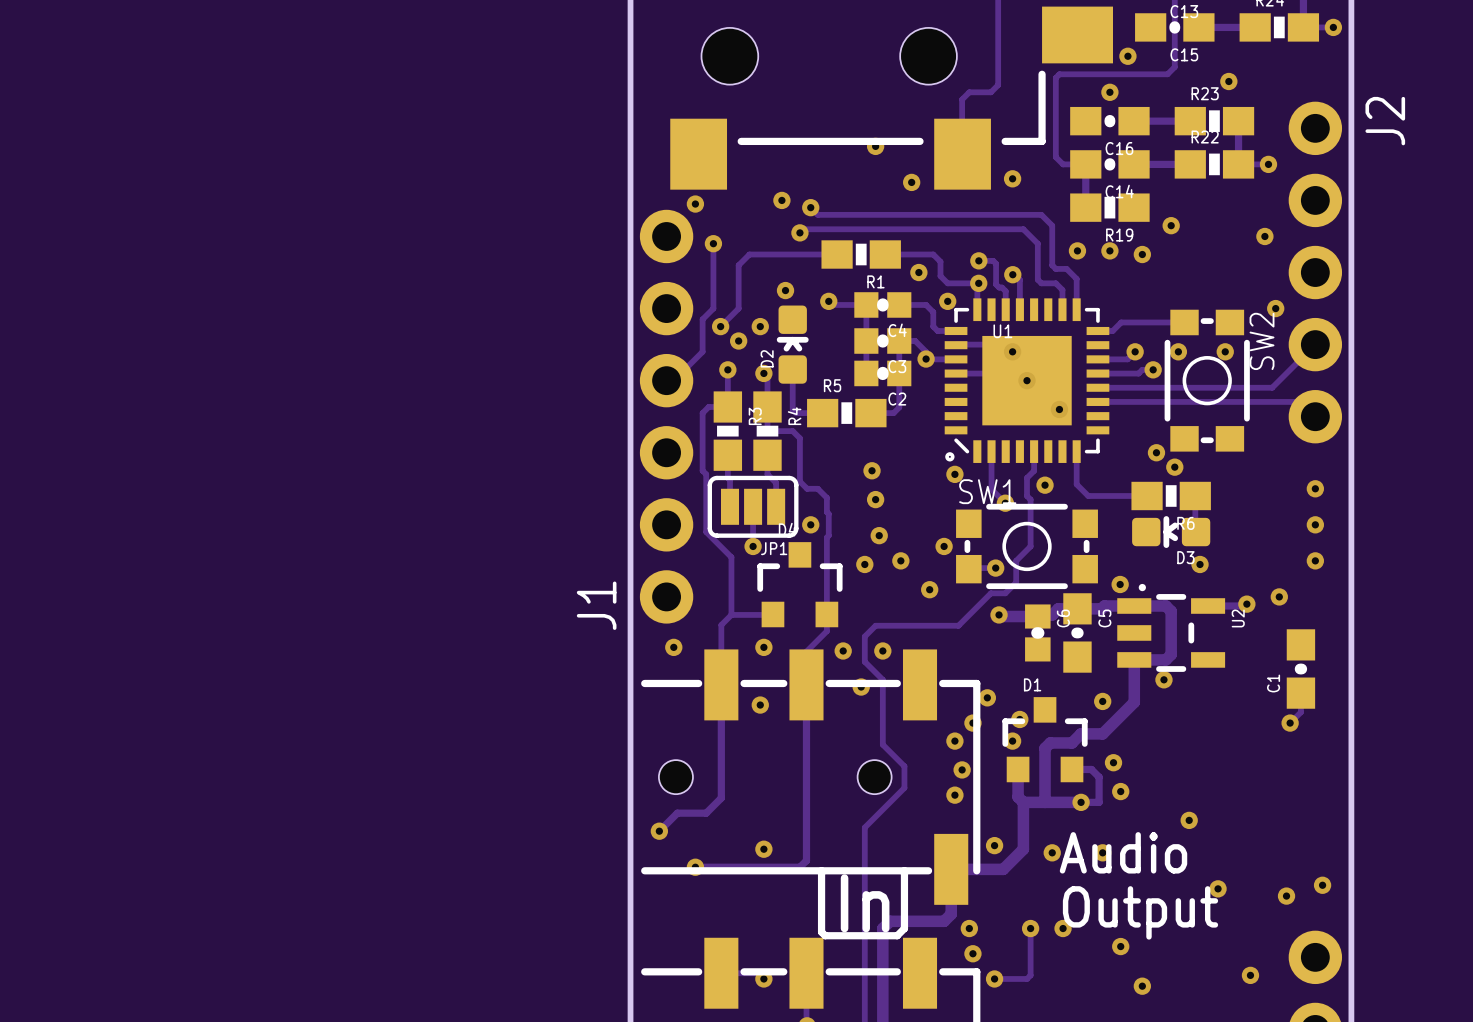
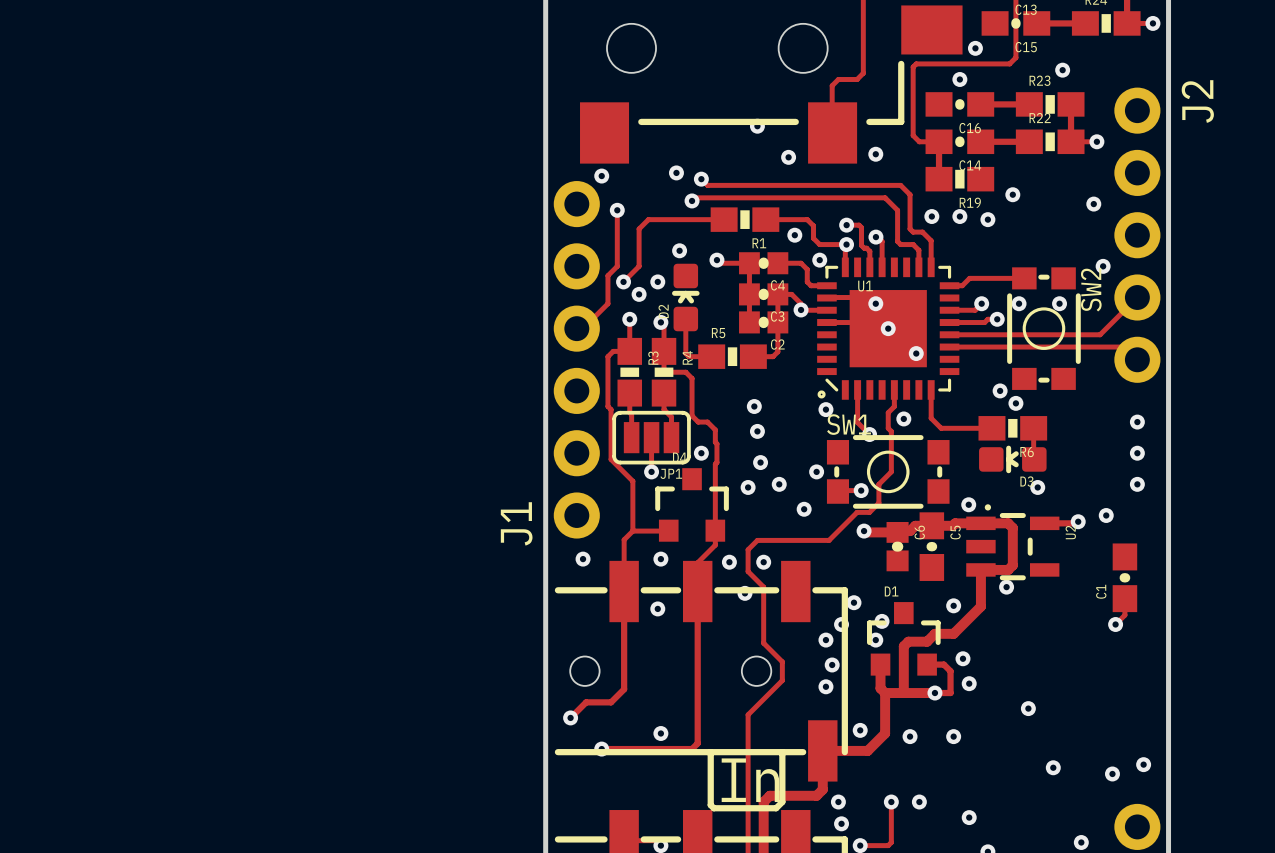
text: Audio (1123, 852) -> none
text: Output (1140, 912) -> none

